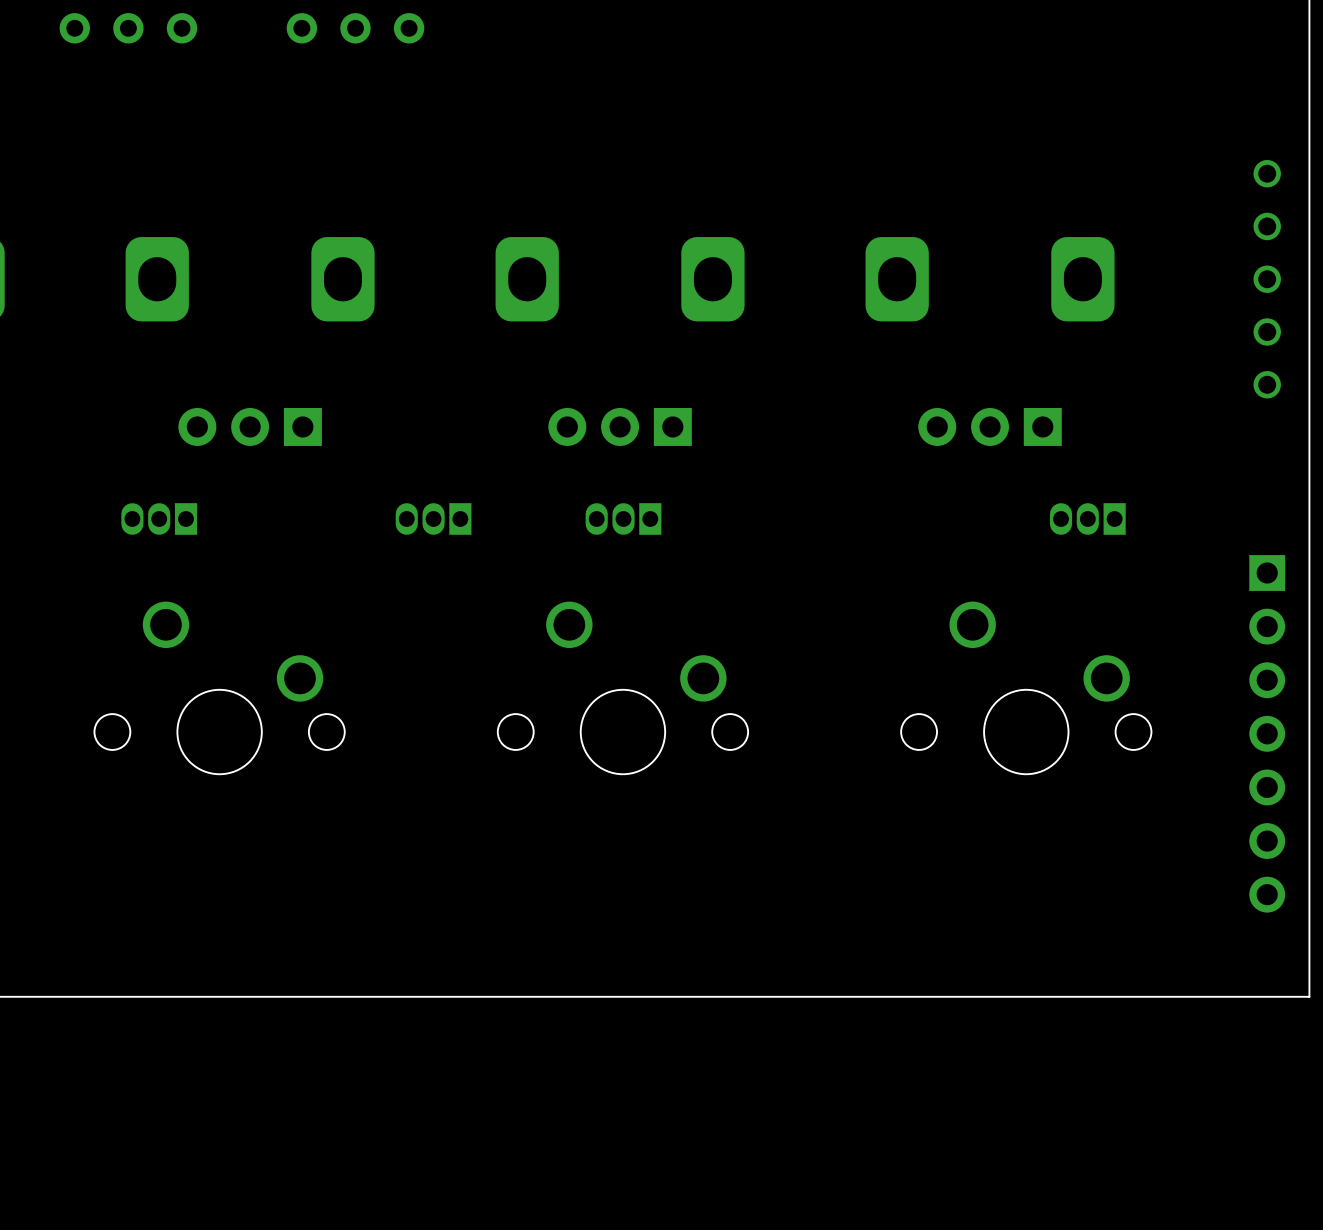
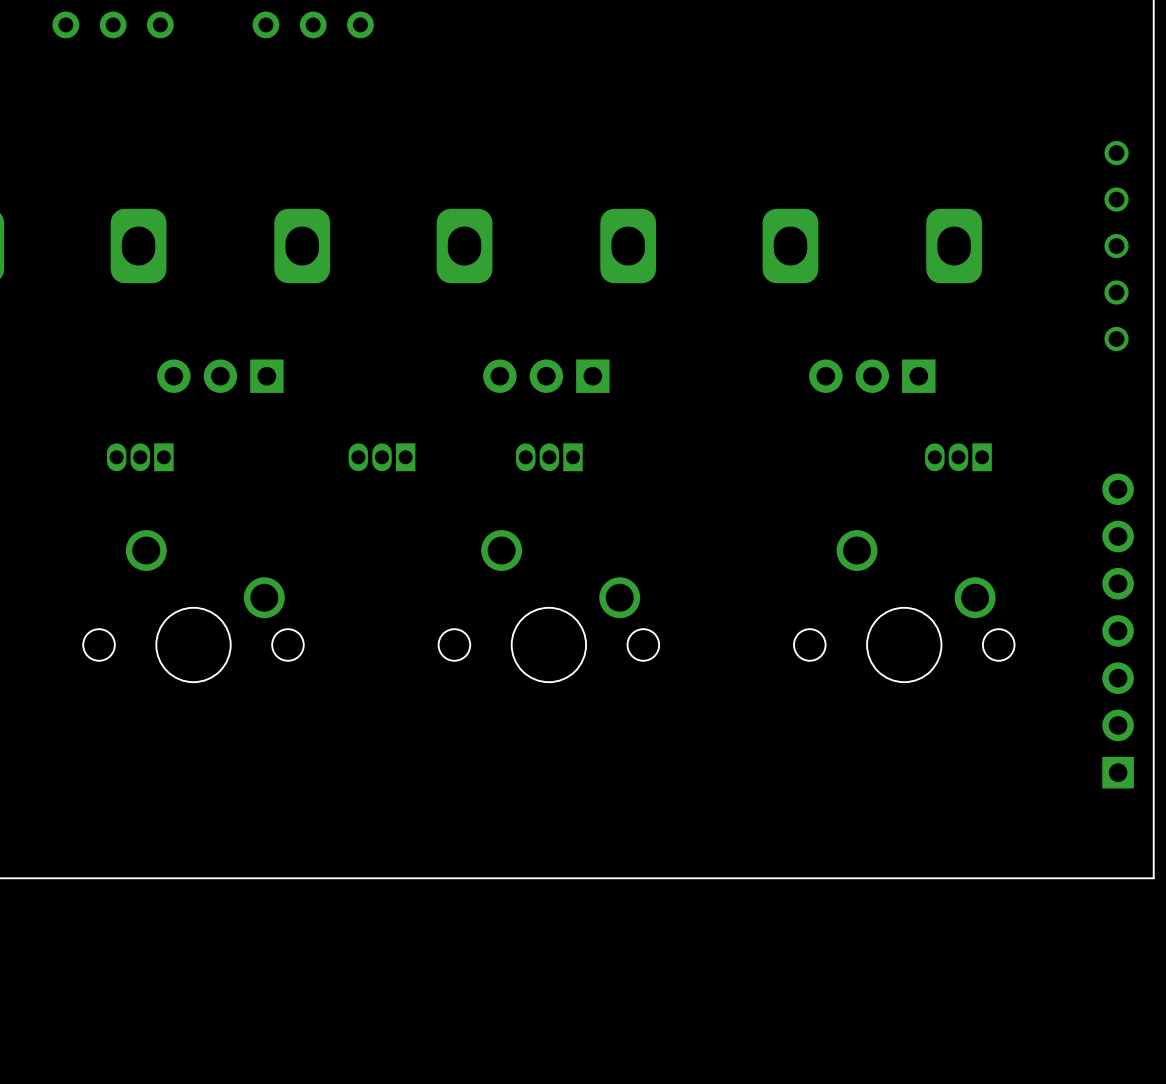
part rotation: 0° (1267, 733) -> 180° (1118, 630)

